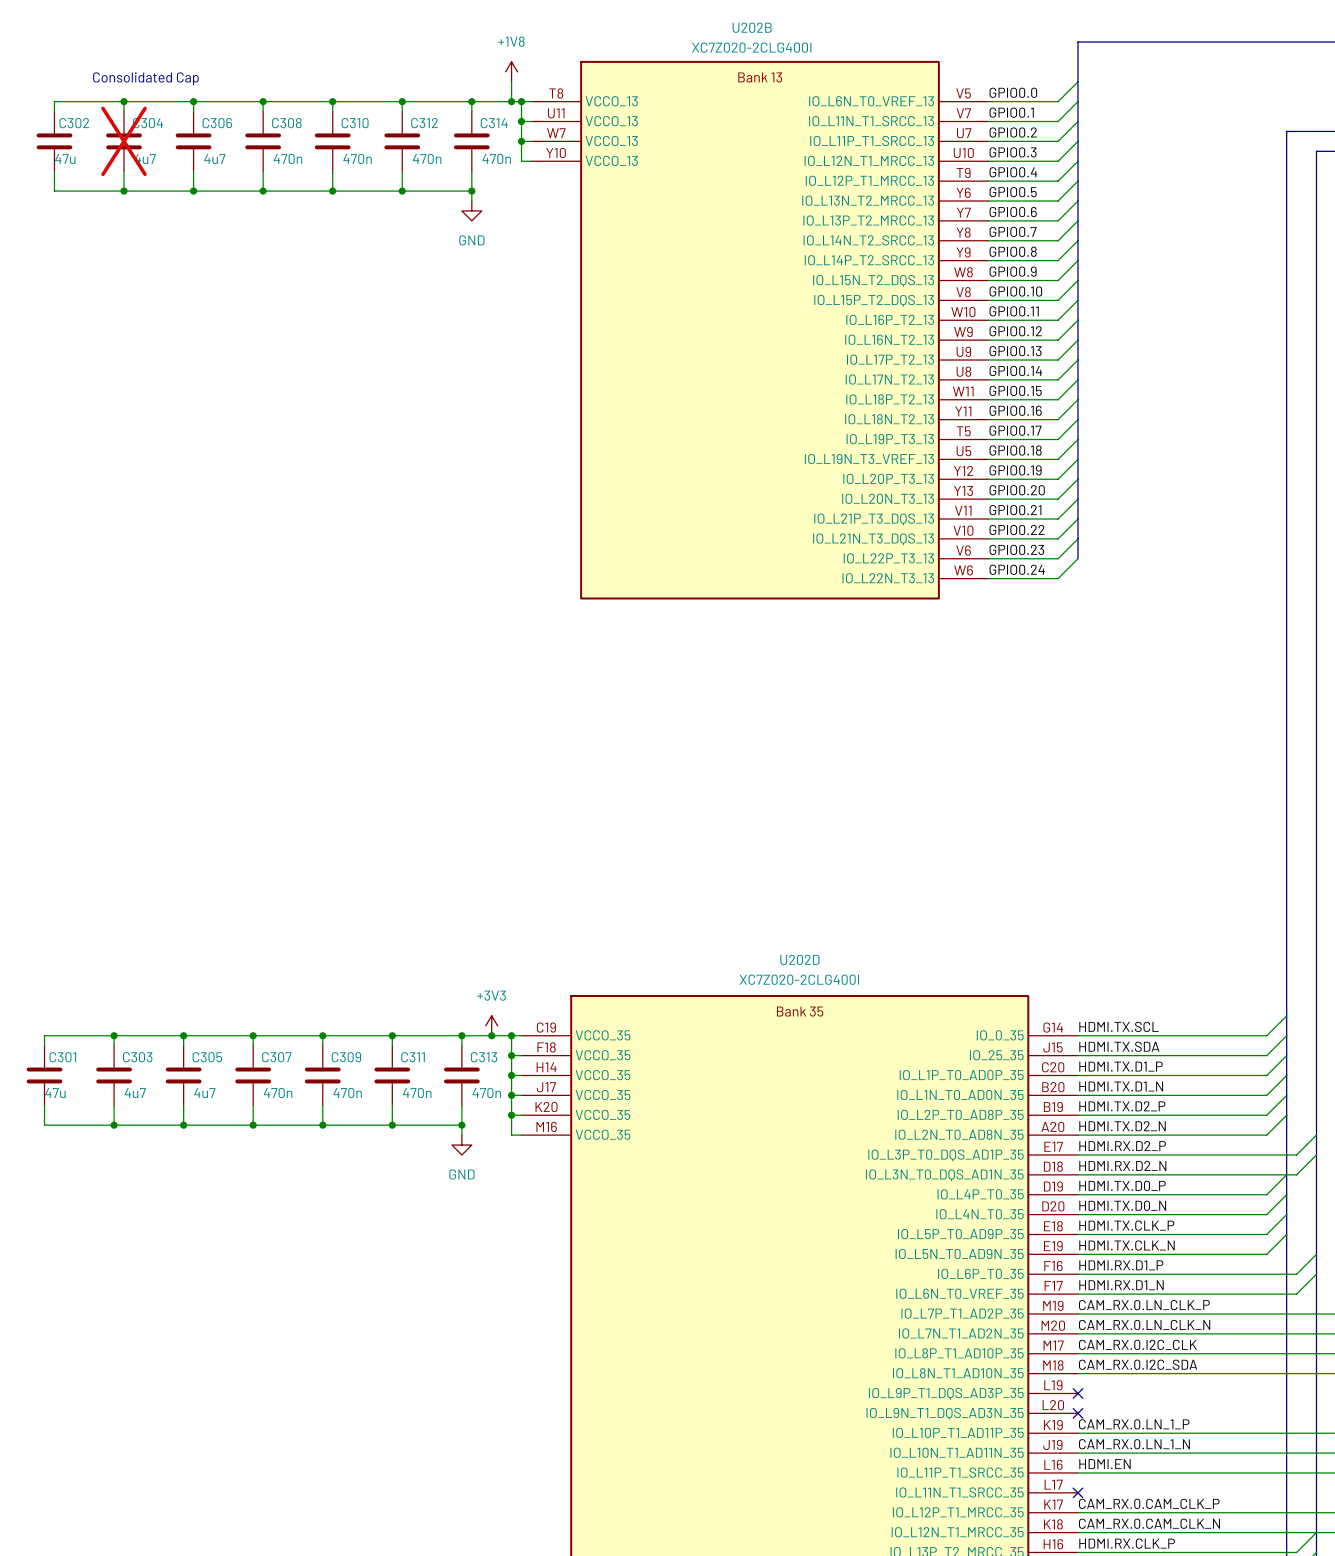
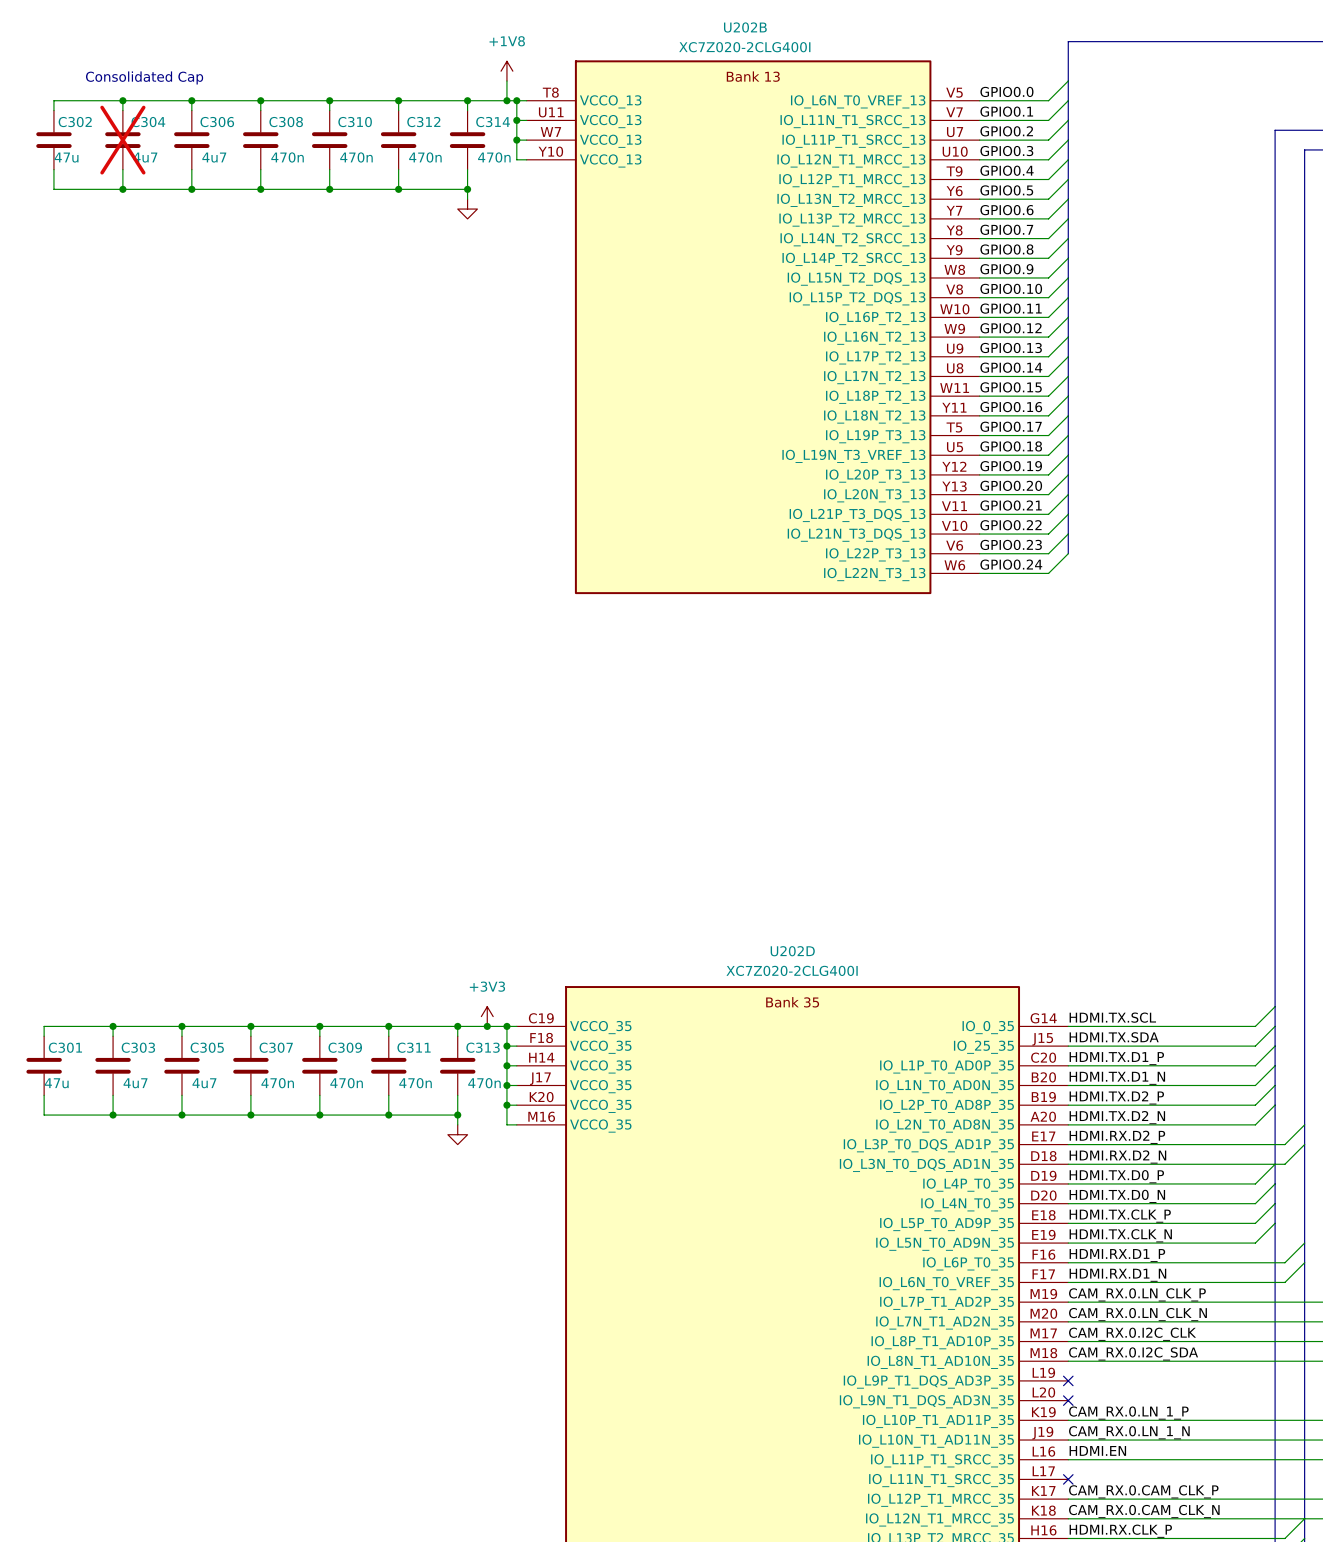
power symbol text: GND (471, 240) -> none
power symbol text: GND (461, 1174) -> none

